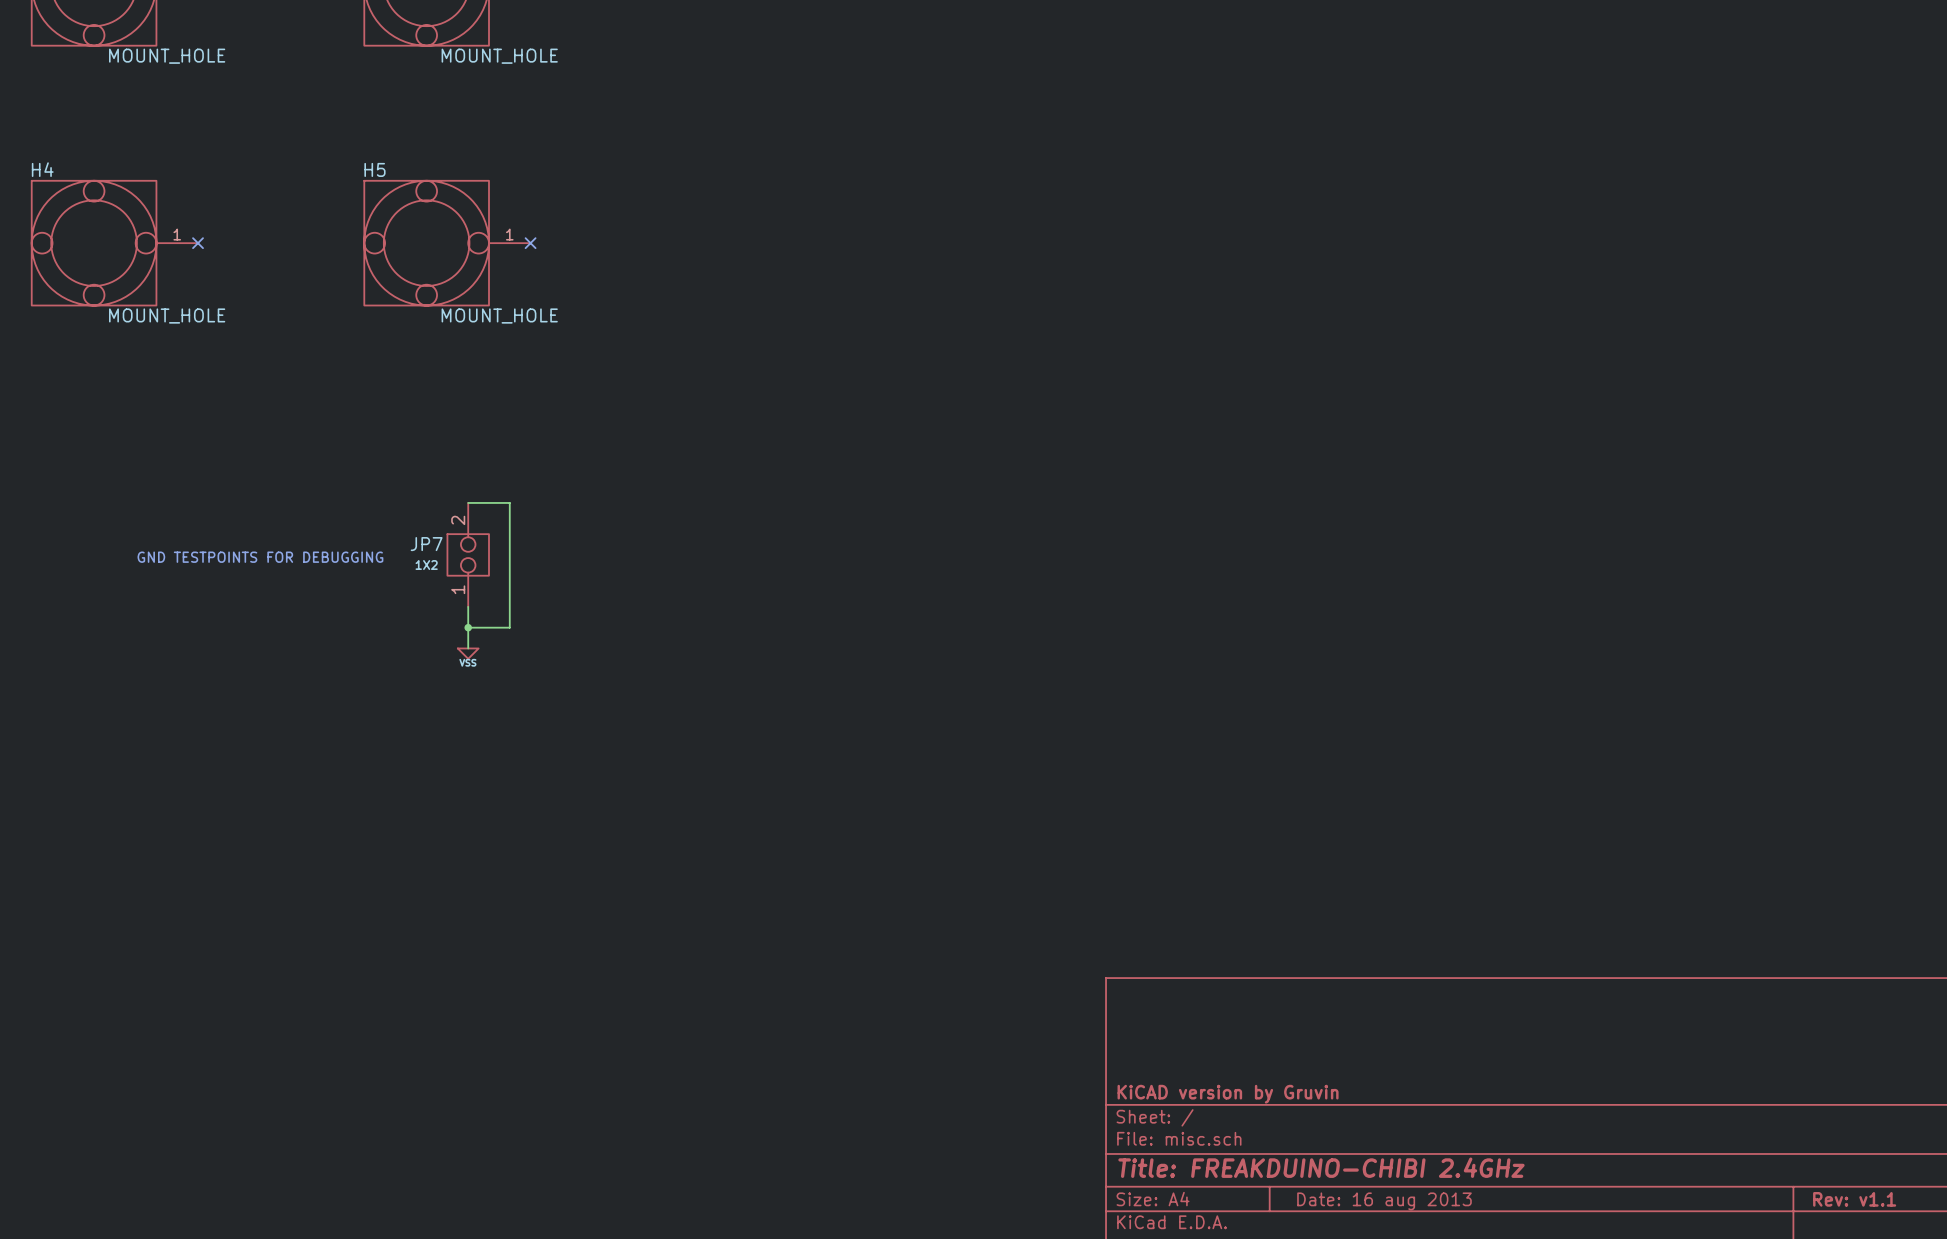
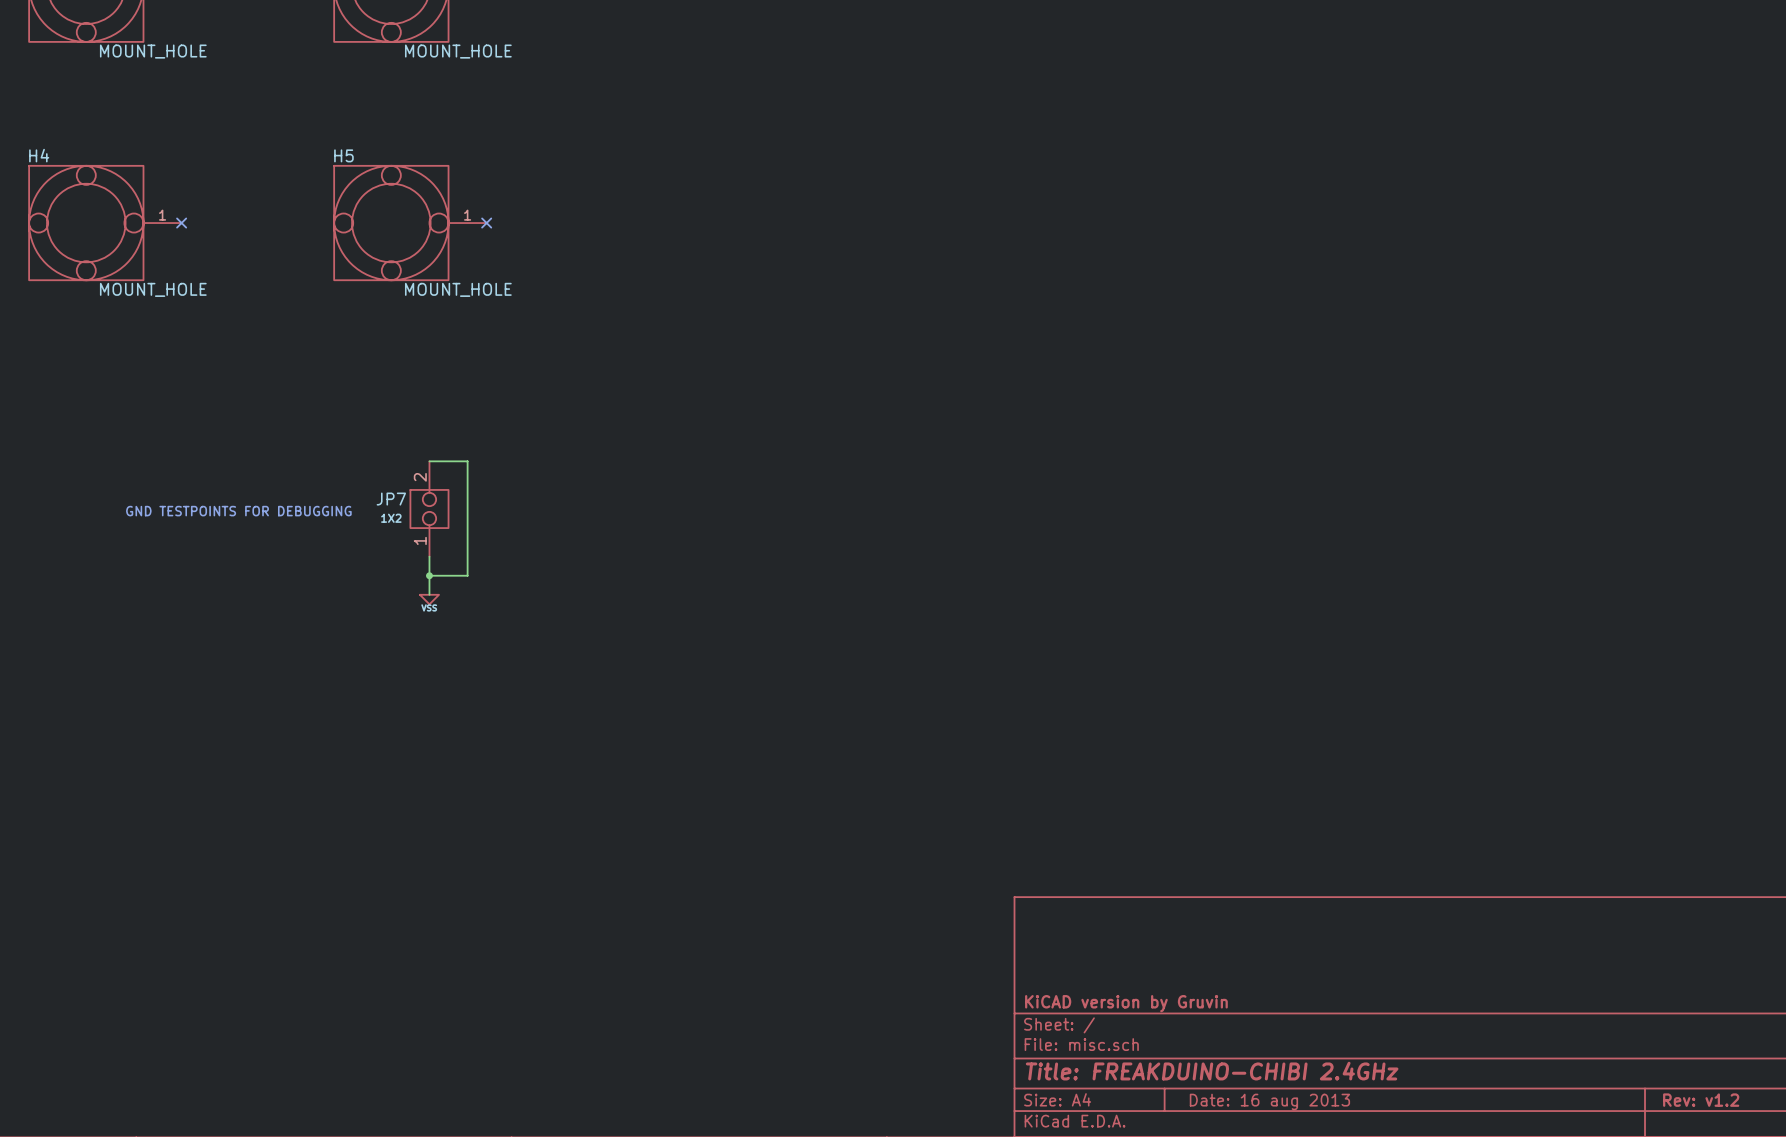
title block: Rev: v1.1 (1854, 1199) -> Rev: v1.2 (1701, 1100)

